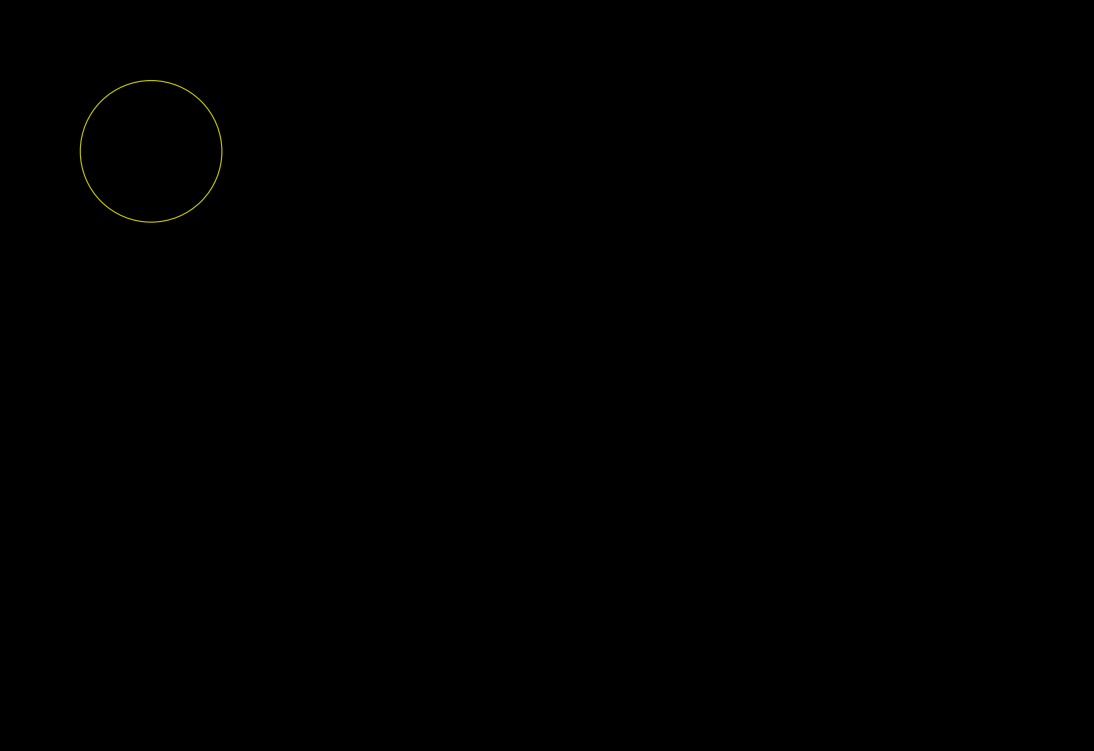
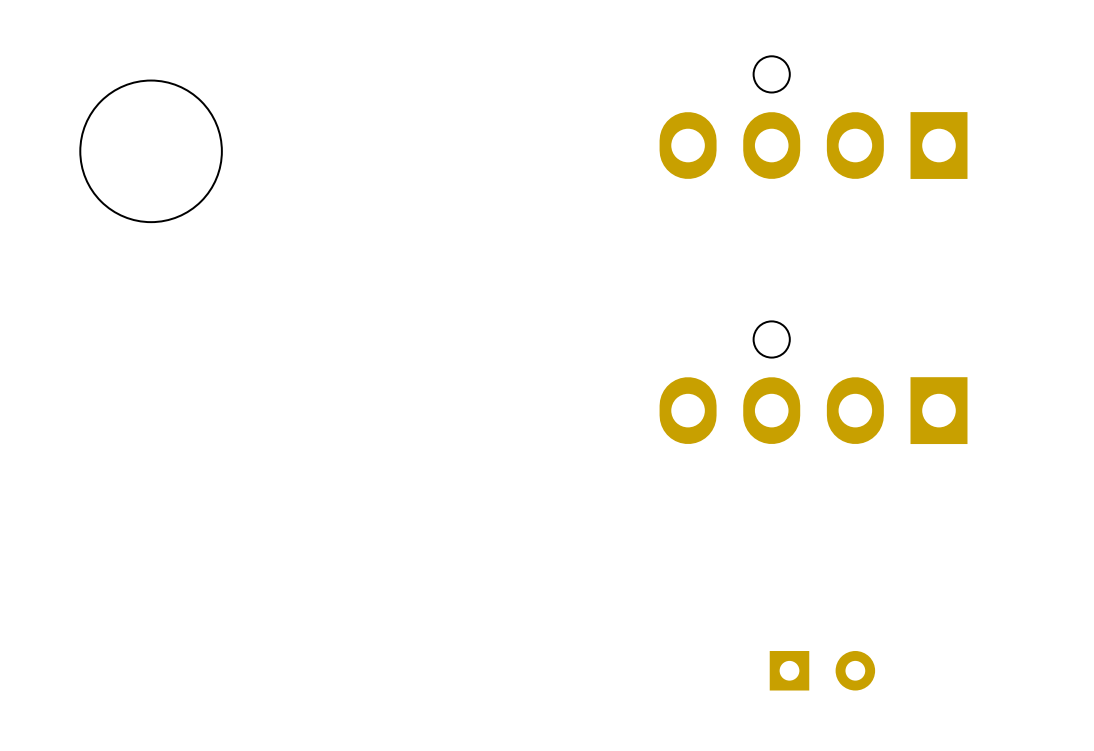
part: none -> (813, 117)
part: none -> (813, 382)
part: none -> (822, 670)

